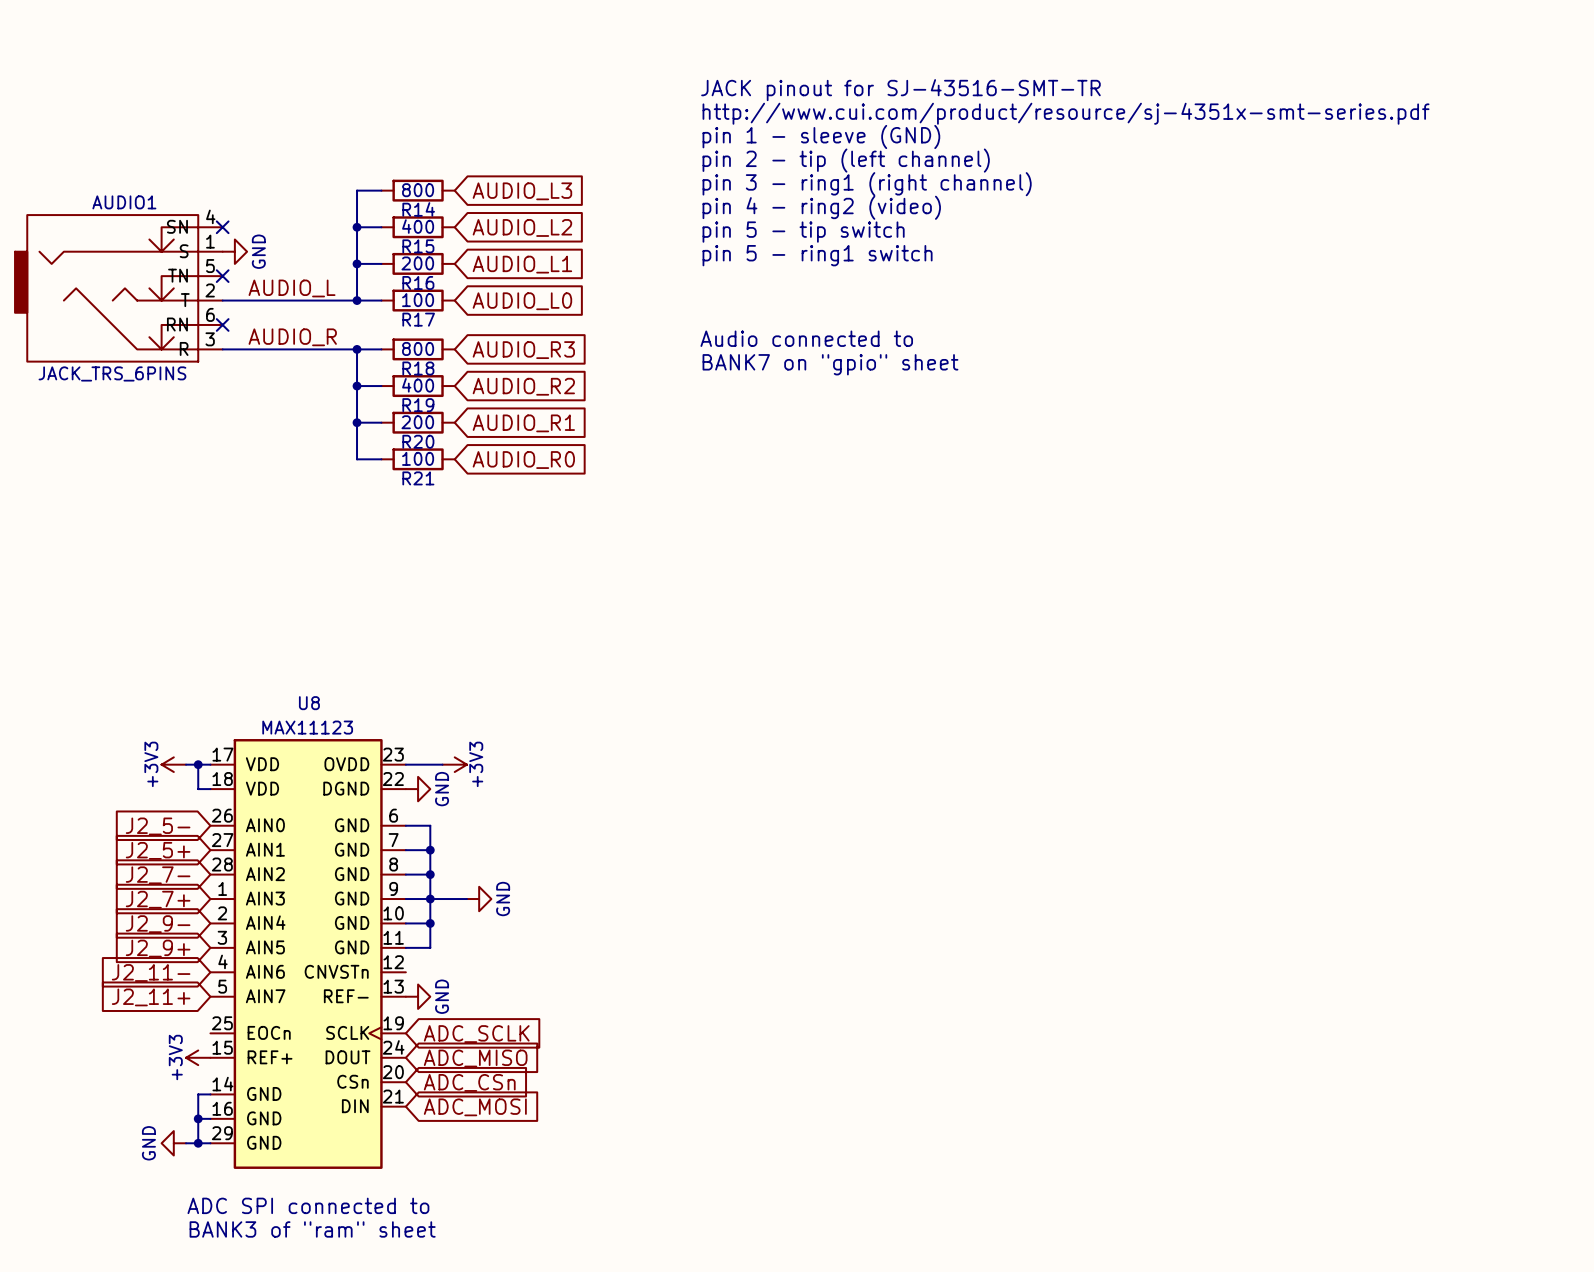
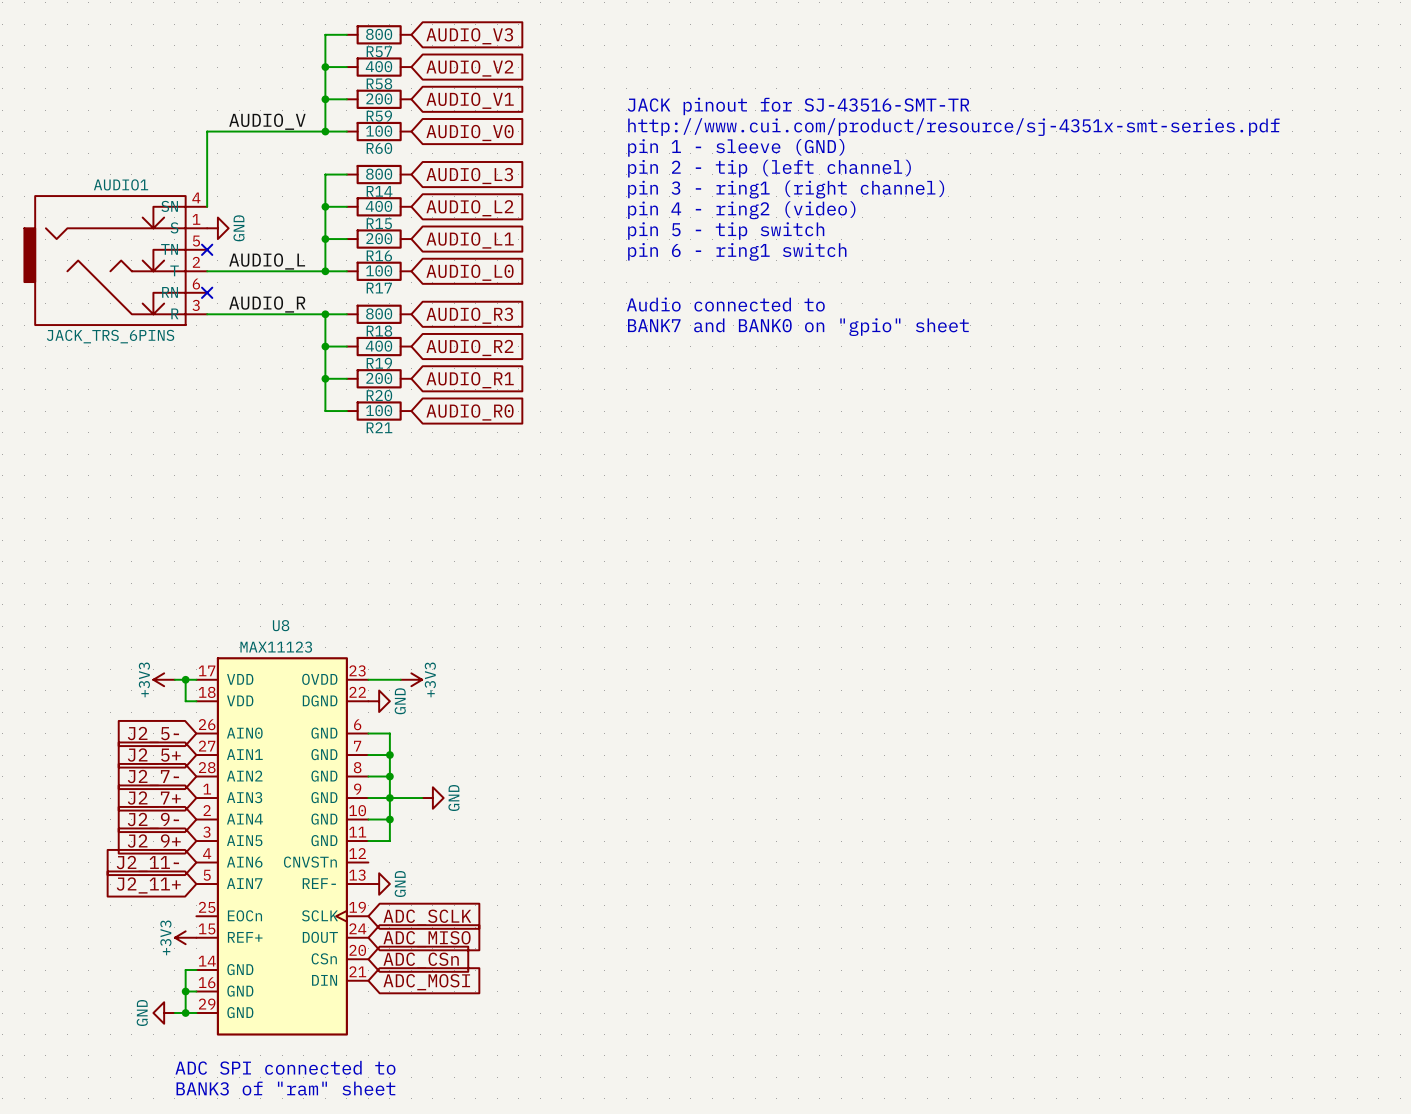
wire: none -> (346, 34) (325, 34) (325, 131)
R57: none -> 800 (379, 34)
global label: none -> AUDIO_V3 (469, 36)
wire: none -> (325, 67) (346, 67)
junction: none -> (325, 67)
R58: none -> 400 (379, 67)
global label: none -> AUDIO_V2 (469, 68)
text: JACK pinout for SJ-43516-SMT-TR (900, 90) -> none
wire: none -> (325, 99) (346, 99)
junction: none -> (325, 99)
R59: none -> 200 (379, 99)
global label: none -> AUDIO_V1 (470, 100)
text: http://www.cui.com/product/resource/sj-4351x-smt-series.pdf (1066, 113) -> JACK pinout for SJ-43516-SMT-TR (798, 106)
label: none -> AUDIO_V (267, 121)
text: pin 1 - sleeve (GND) (821, 136) -> http://www.cui.com/product/resource/sj-4351x-smt-series.pdf (953, 127)
junction: none -> (325, 131)
wire: none -> (346, 131) (207, 131) (207, 206)
R60: none -> 100 (379, 131)
global label: none -> AUDIO_V0 (470, 133)
text: pin 2 - tip (left channel) (846, 160) -> pin 1 - sleeve (GND) (736, 147)
text: pin 3 - ring1 (right channel) (867, 184) -> pin 2 - tip (left channel) (769, 168)
text: pin 4 - ring2 (video) (821, 207) -> pin 3 - ring1 (right channel) (786, 189)
no-connect mark: (222, 227) -> none
text: pin 5 - tip switch (803, 232) -> pin 4 - ring2 (video) (741, 210)
text: pin 5 - ring1 switch (817, 255) -> pin 5 - tip switch (726, 231)
text: none -> pin 6 - ring1 switch (737, 251)
text: BANK7 on "gpio" sheet (830, 364) -> BANK7 and BANK0 on "gpio" sheet (798, 327)

